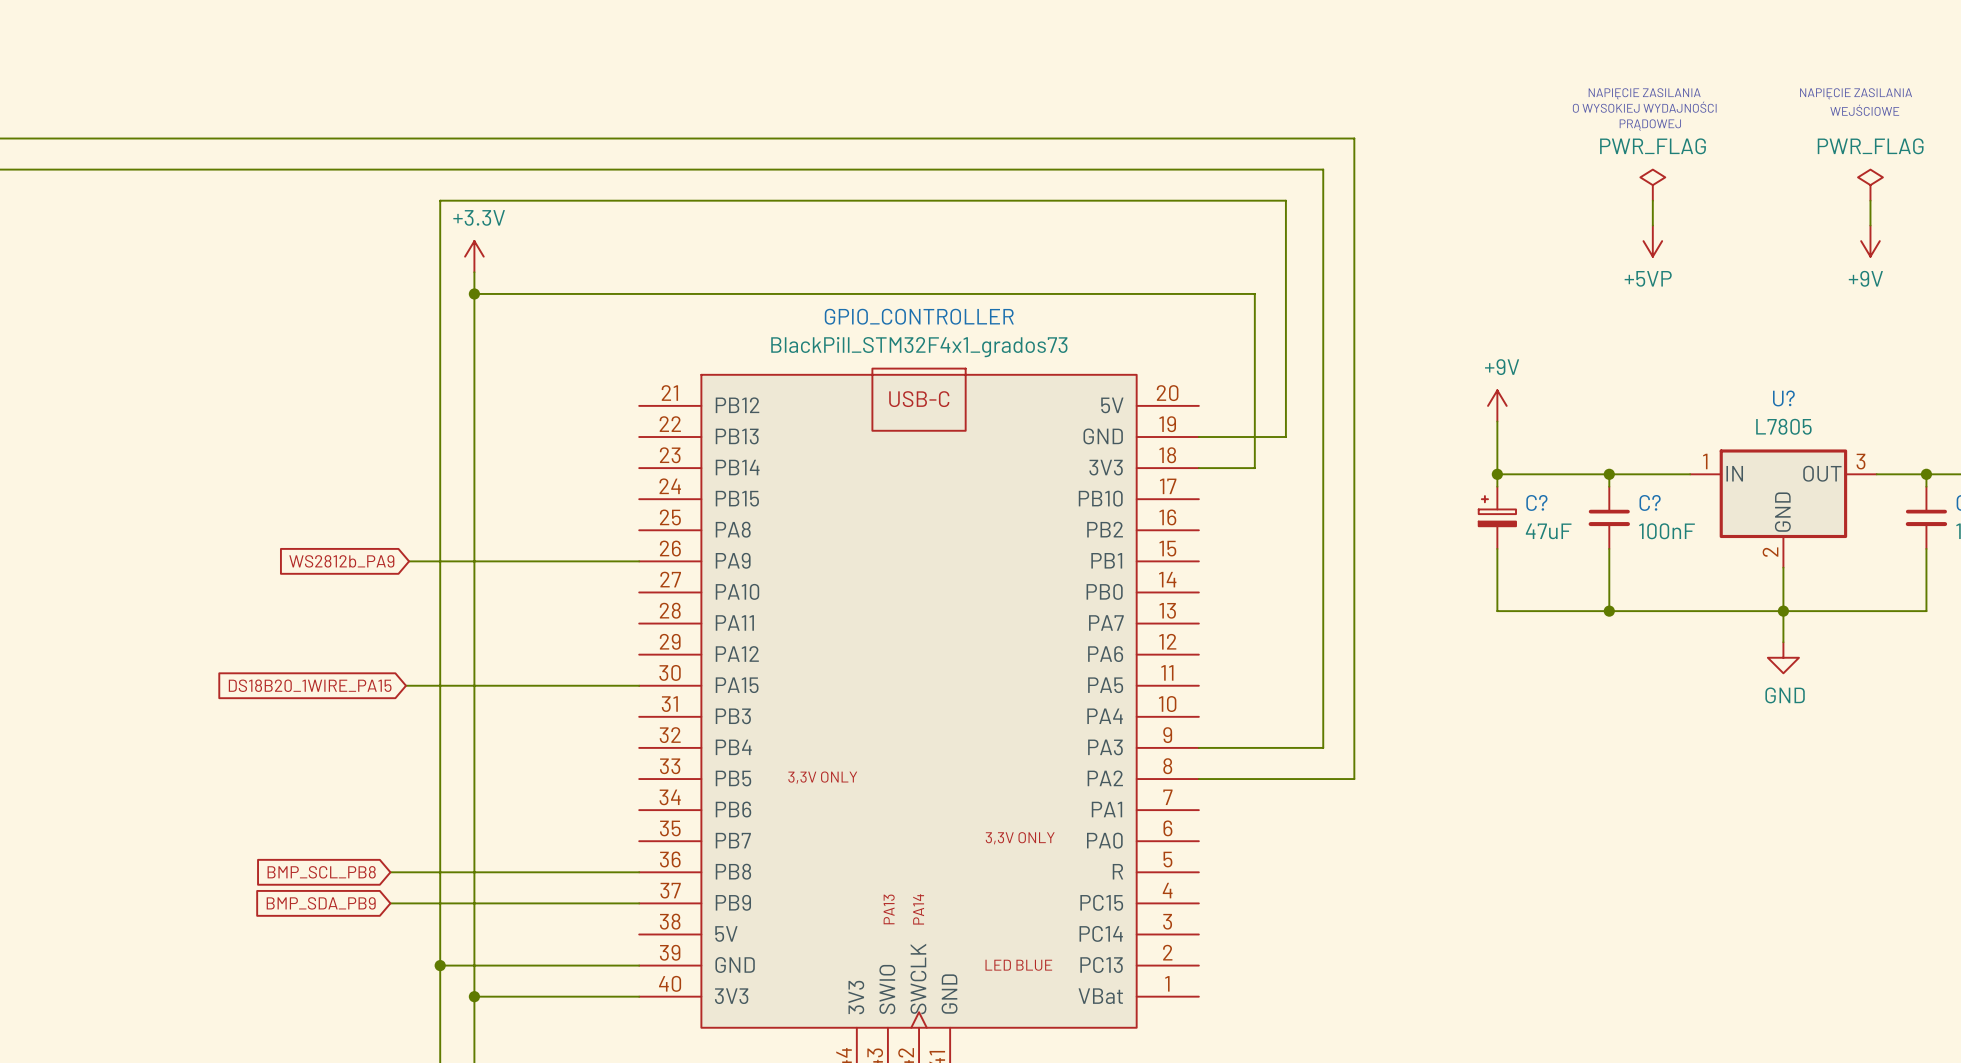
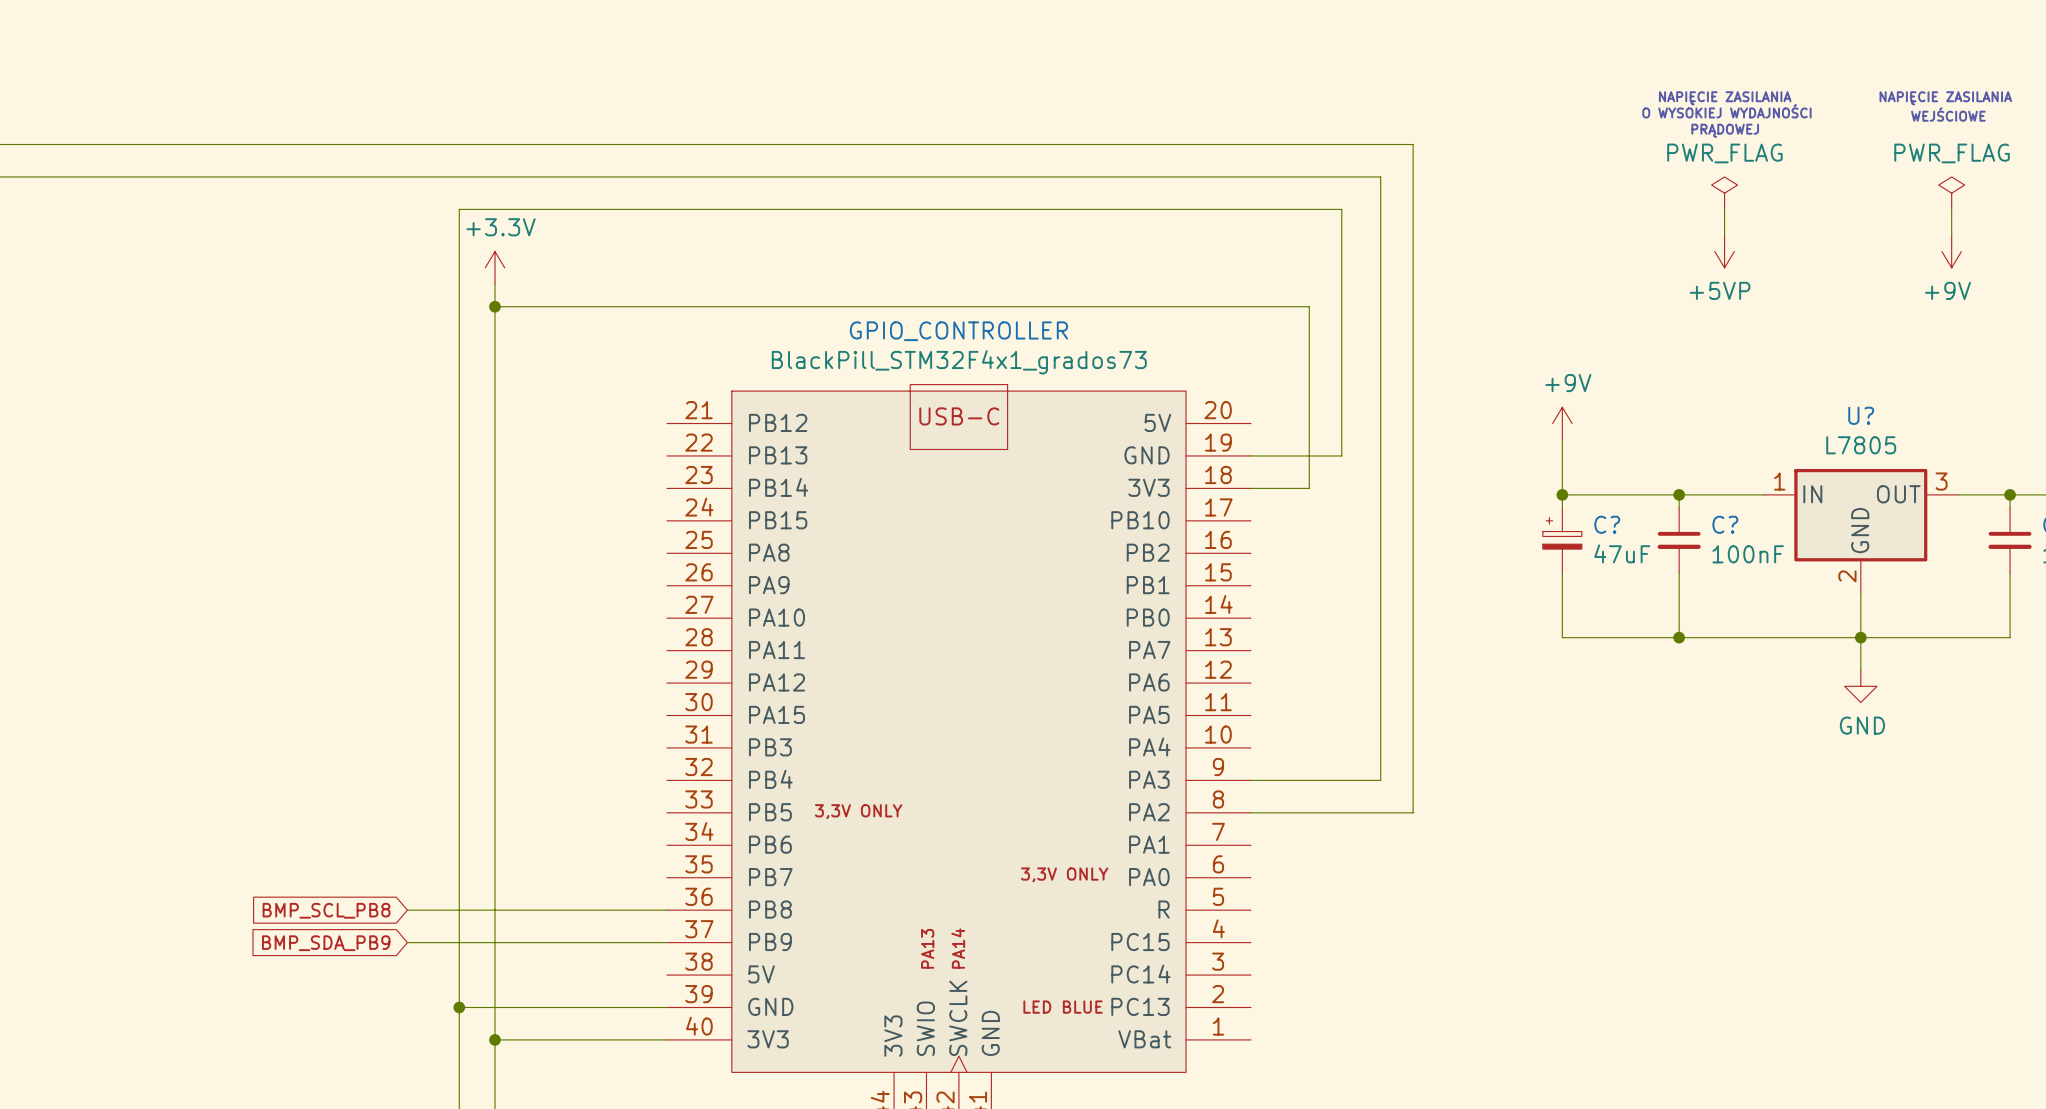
global label: WS2812b_PA9 (341, 561) -> none
wire: (409, 561) (639, 561) -> none
global label: DS18B20_1WIRE_PA15 (310, 685) -> none
wire: (406, 685) (639, 685) -> none

